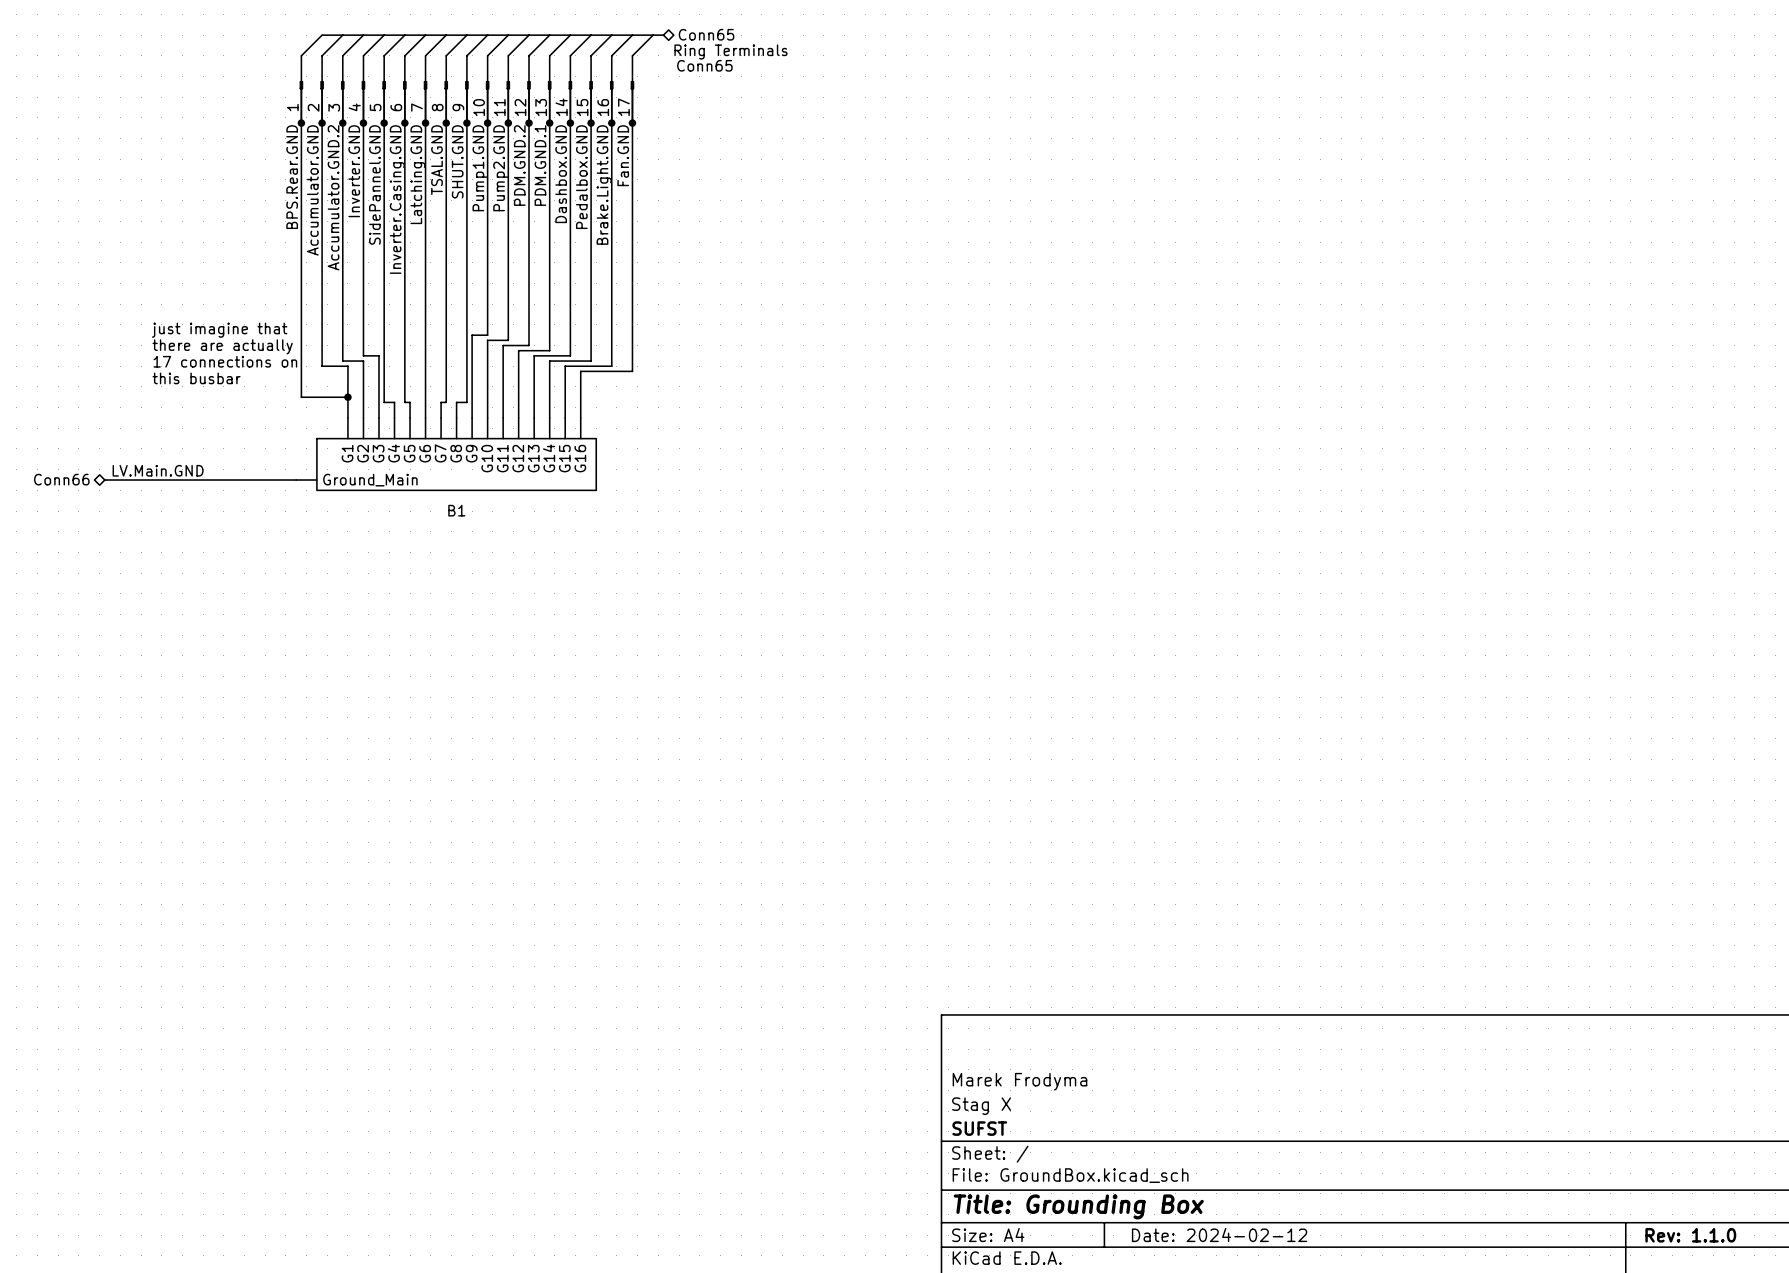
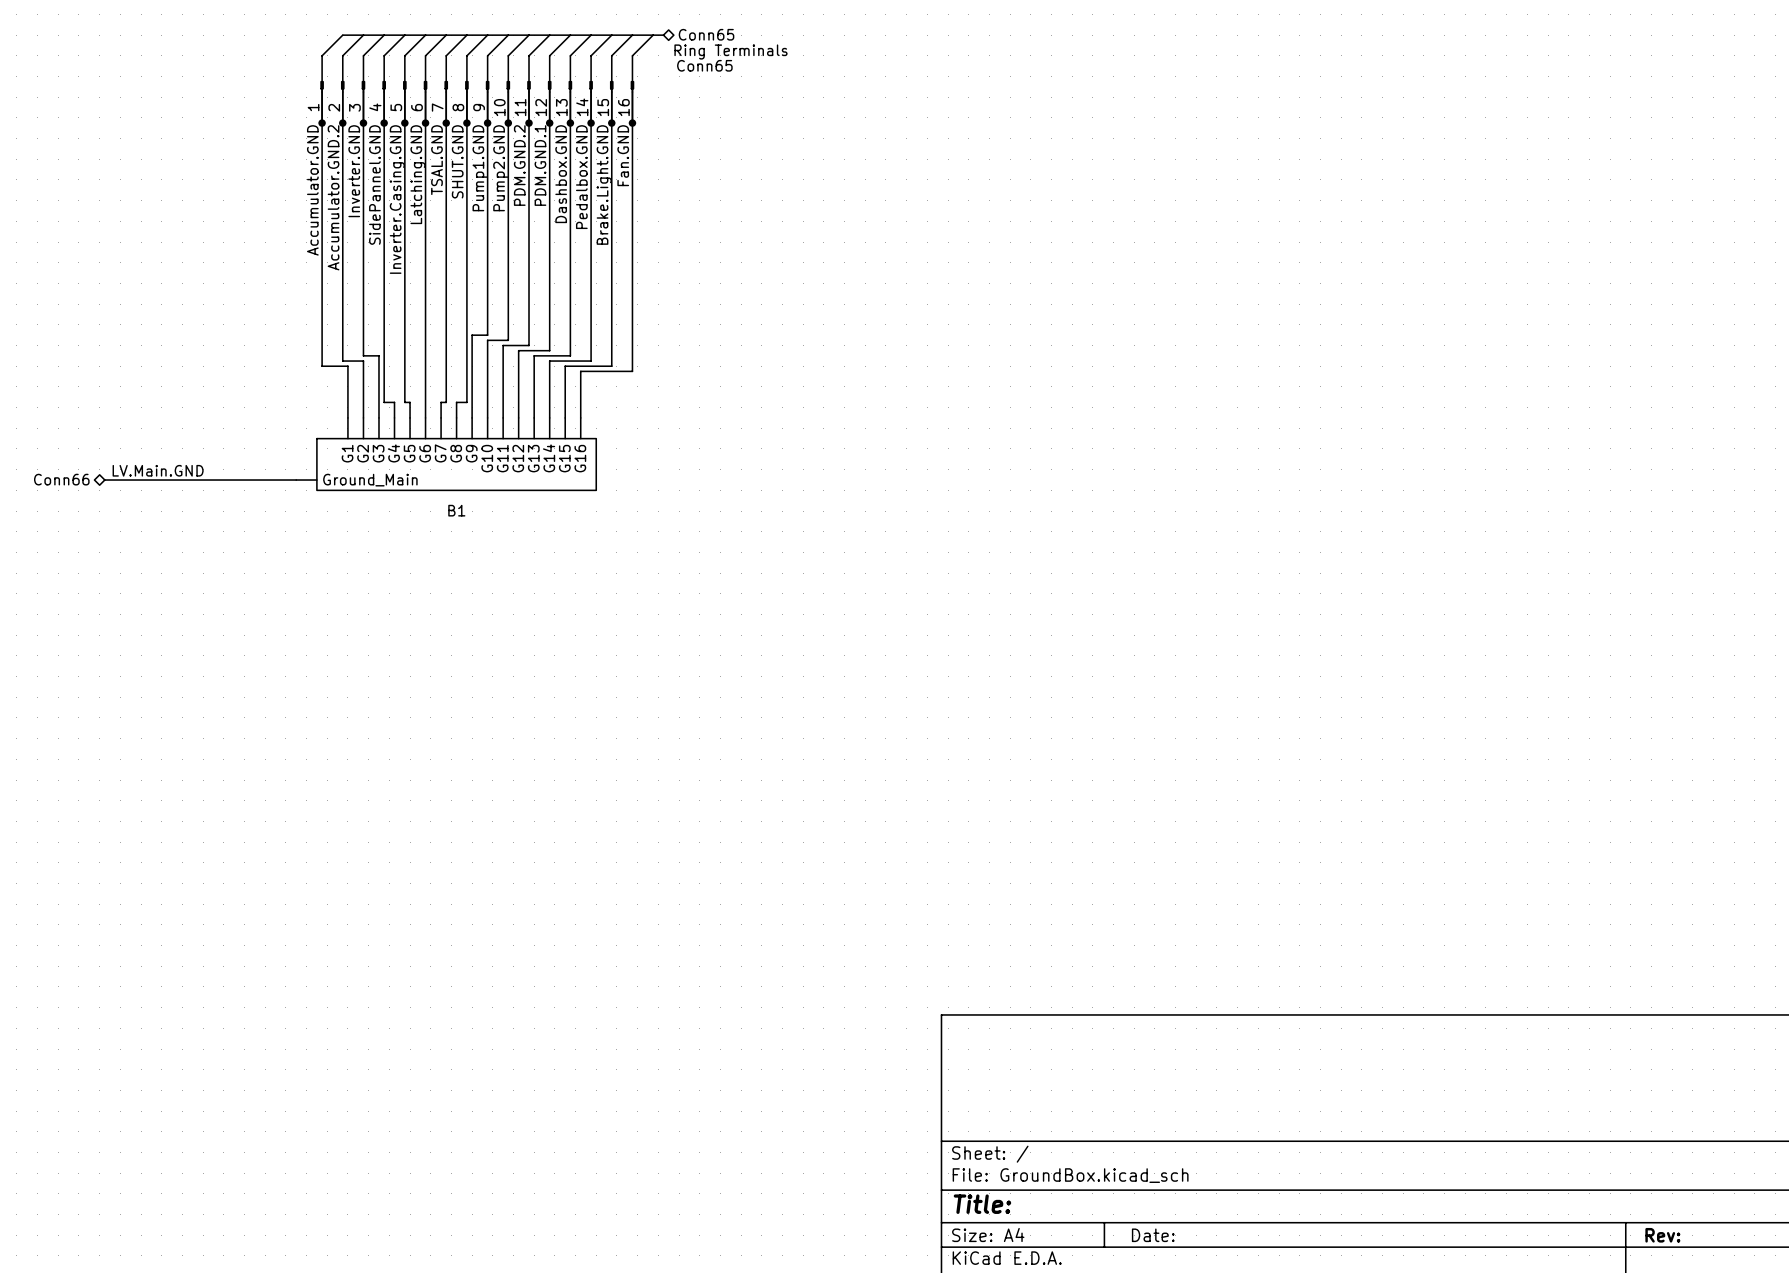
wire: (322, 35) (301, 55) (301, 397) (347, 397) -> none
bus: (322, 35) (342, 35) -> none
Conn65 symbol: [299, 81, 635, 124] -> [320, 81, 635, 124]
junction: (301, 123) -> none
label: BPS.Rear.GND (292, 177) -> none
text: just imagine that (219, 330) -> none
text: there are actually (222, 346) -> none
text: 17 connections on (225, 361) -> none
text: this busbar (196, 378) -> none
junction: (347, 397) -> none
title block: Marek Frodyma (1019, 1081) -> none
title block: Stag X (981, 1106) -> none
title block: SUFST (979, 1128) -> none
title block: Title: Grounding Box (1078, 1206) -> Title: (982, 1204)
title block: Date: 2024-02-12 (1219, 1234) -> Date: (1153, 1235)
title block: Rev: 1.1.0 (1690, 1235) -> Rev: (1662, 1235)

